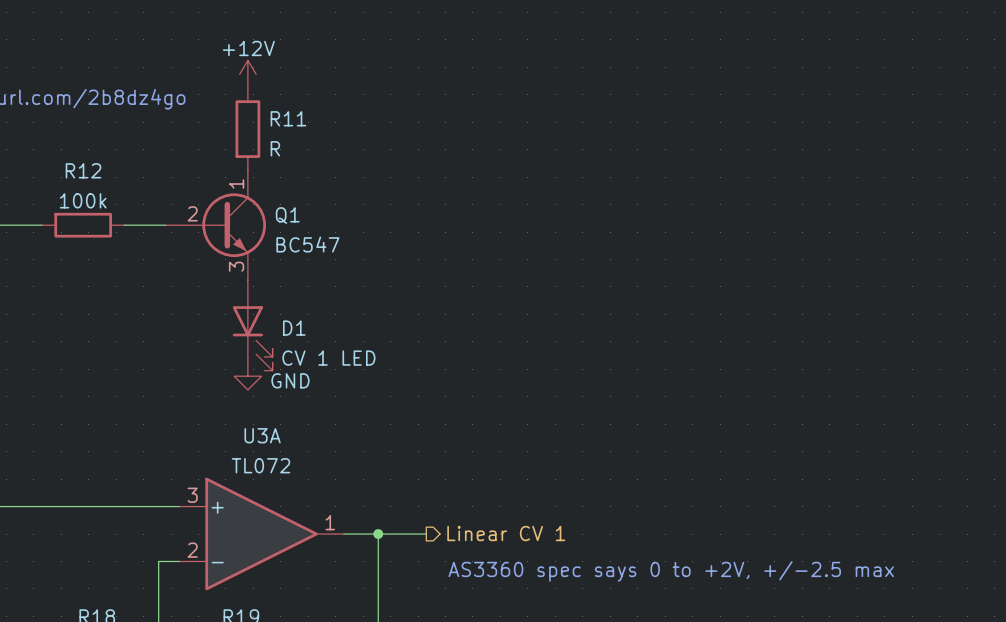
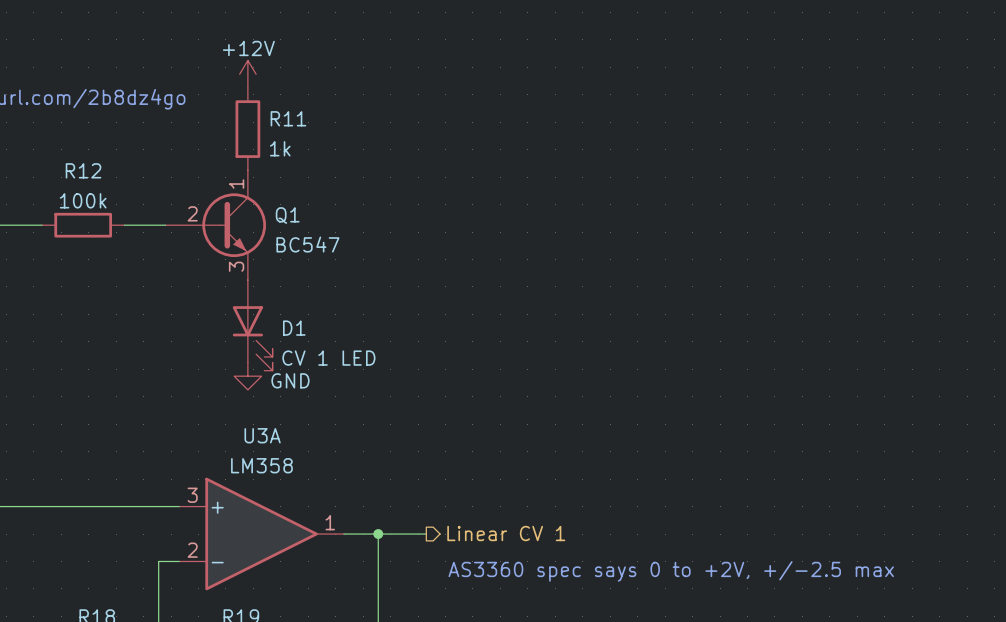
R11 value: R (275, 148) -> 1k (280, 148)
U3A value: TL072 (260, 465) -> LM358 (261, 465)

